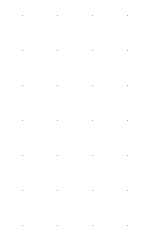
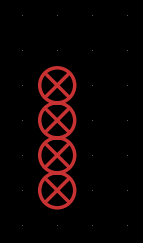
part: none -> (57, 85)
part: none -> (57, 120)
part: none -> (57, 155)
part: none -> (57, 190)

